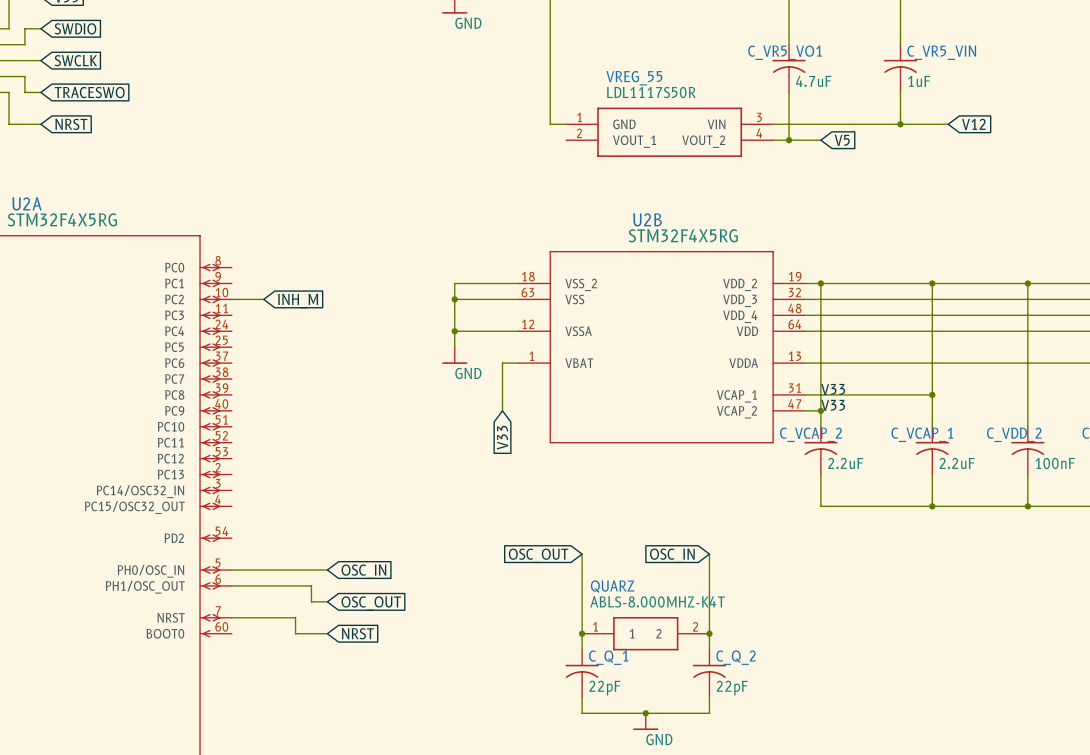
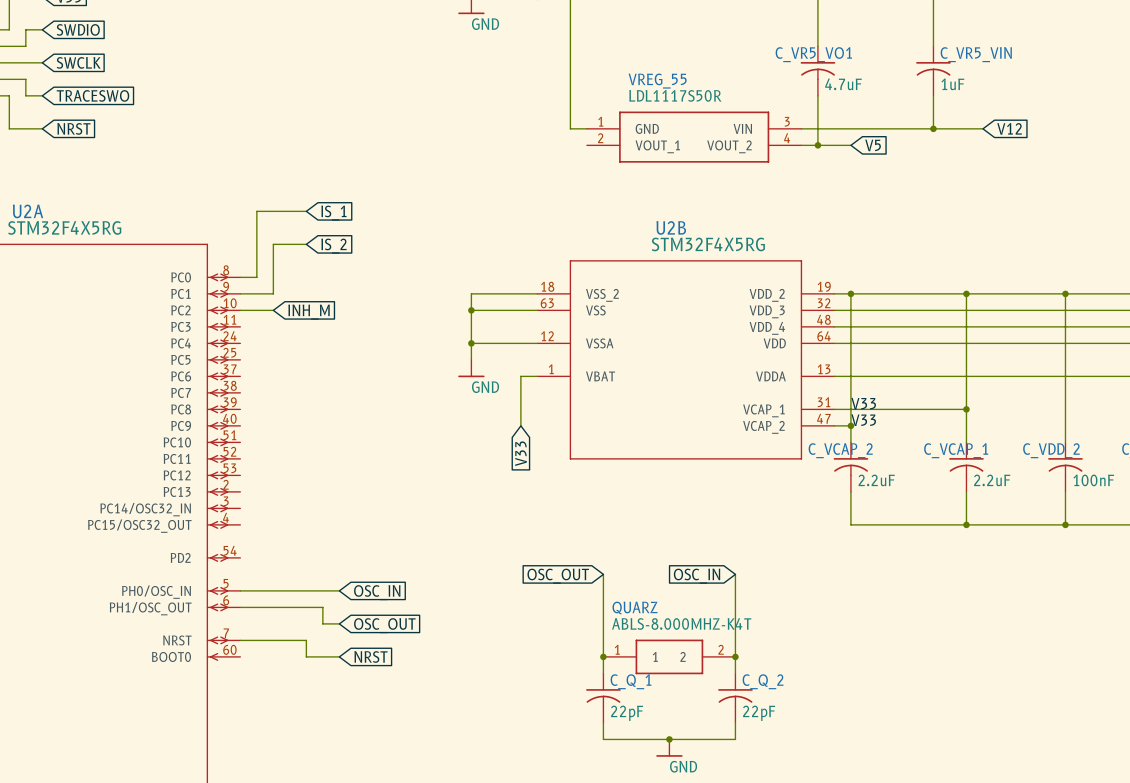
wire: none -> (306, 211) (256, 211) (256, 277) (240, 277)
global label: none -> IS_1 (333, 213)
wire: none -> (306, 244) (273, 244) (273, 293) (240, 293)
global label: none -> IS_2 (333, 246)

